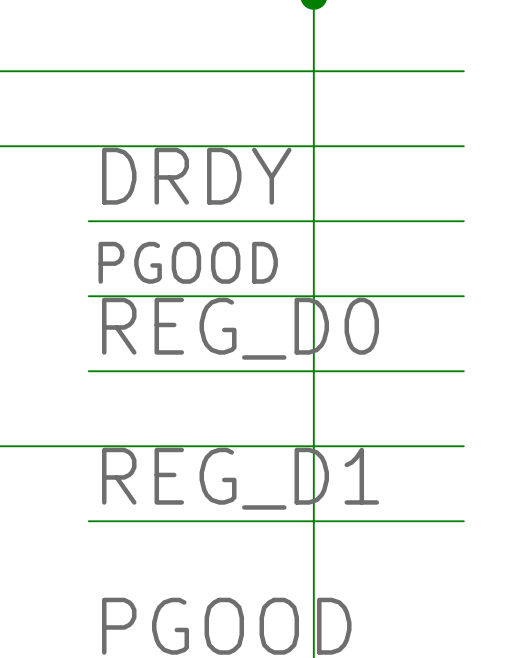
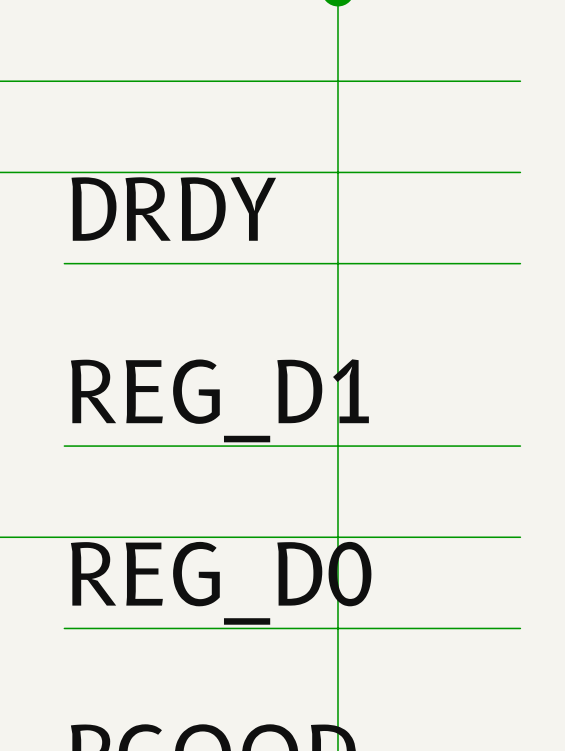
label: PGOOD (188, 262) -> none
wire: (88, 296) (463, 296) -> none
label: REG_D0 (240, 328) -> REG_D1 (219, 400)
label: REG_D1 (240, 478) -> REG_D0 (221, 583)

